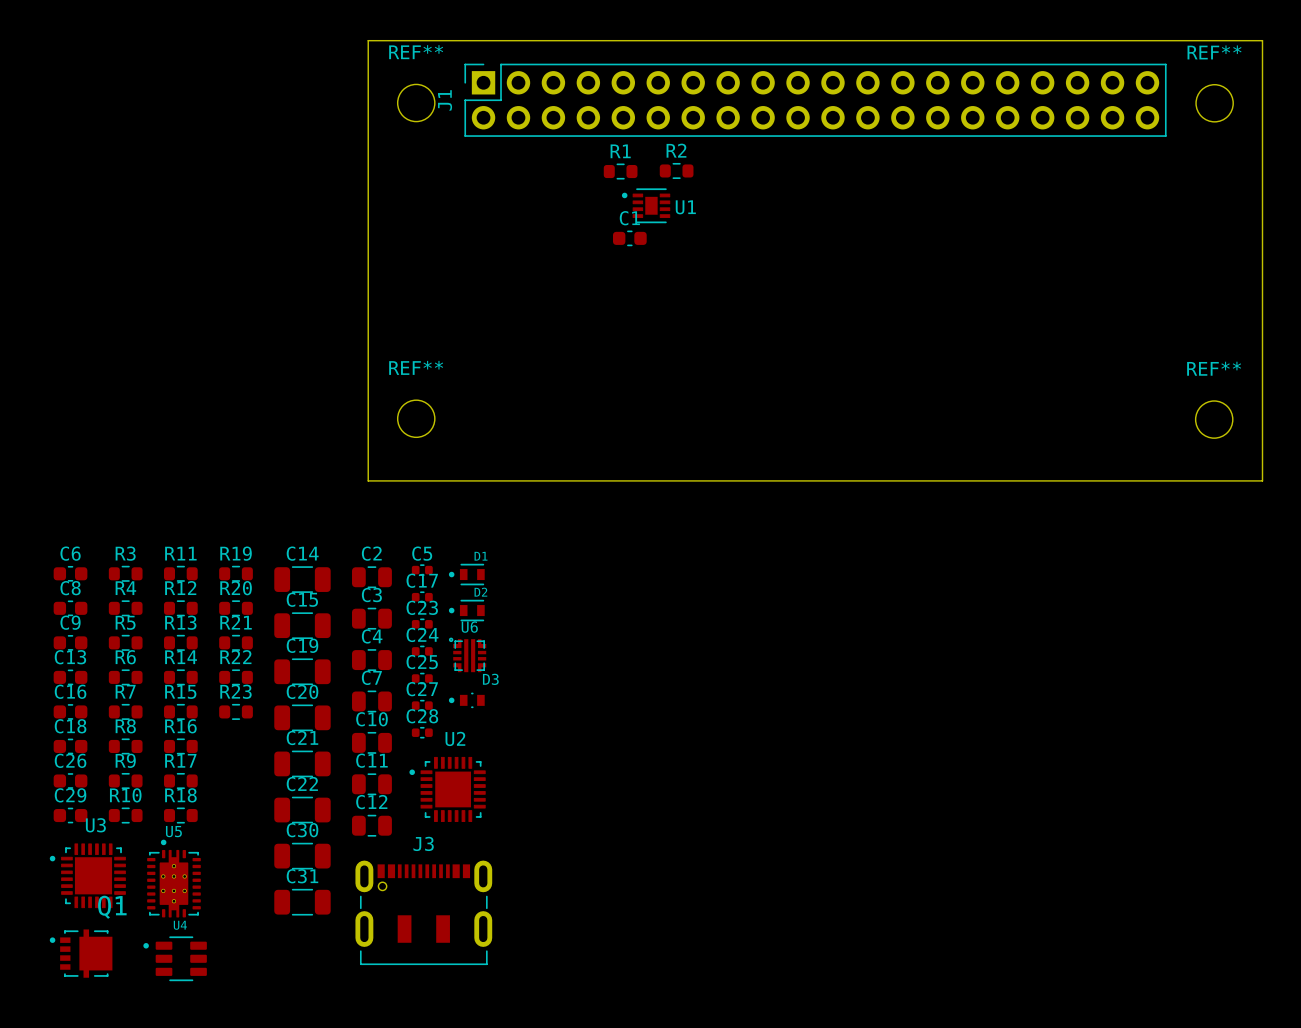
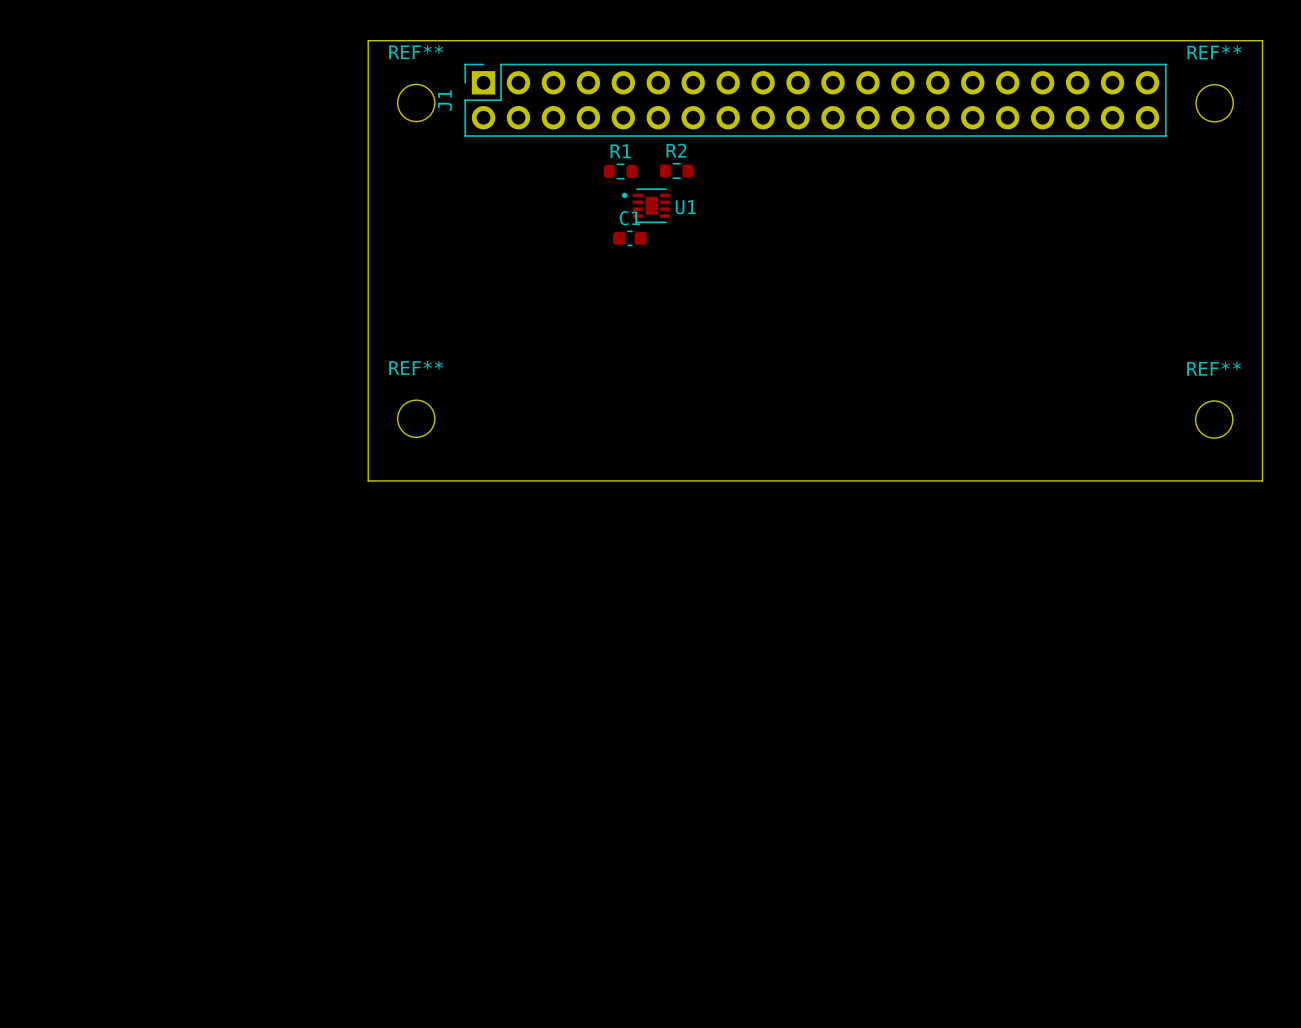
C5: (422, 570) -> none
C6: (70, 573) -> none
R3: (125, 573) -> none
R11: (180, 573) -> none
R19: (236, 573) -> none
D1: (466, 574) -> none
C2: (371, 577) -> none
C14: (302, 579) -> none
C17: (422, 597) -> none
C8: (70, 608) -> none
R4: (125, 608) -> none
R12: (180, 608) -> none
R20: (236, 608) -> none
D2: (466, 610) -> none
C3: (371, 618) -> none
C23: (422, 624) -> none
C15: (302, 625) -> none
C9: (70, 642) -> none
R5: (125, 642) -> none
R13: (180, 642) -> none
R21: (236, 642) -> none
C24: (422, 651) -> none
U6: (467, 654) -> none
C4: (371, 660) -> none
C19: (302, 671) -> none
C13: (70, 677) -> none
R6: (125, 677) -> none
R14: (180, 677) -> none
R22: (236, 677) -> none
C25: (422, 678) -> none
D3: (466, 700) -> none
C7: (371, 701) -> none
C27: (422, 705) -> none
C16: (70, 711) -> none
R7: (125, 711) -> none
R15: (180, 711) -> none
R23: (236, 711) -> none
C20: (302, 717) -> none
C28: (422, 732) -> none
C10: (371, 742) -> none
C18: (70, 746) -> none
R8: (125, 746) -> none
R16: (180, 746) -> none
C21: (302, 763) -> none
C26: (70, 780) -> none
R9: (125, 780) -> none
R17: (180, 780) -> none
C11: (371, 784) -> none
U2: (447, 789) -> none
C22: (302, 810) -> none
C29: (70, 815) -> none
R10: (125, 815) -> none
R18: (180, 815) -> none
C12: (371, 825) -> none
C30: (302, 856) -> none
U3: (87, 875) -> none
U5: (173, 878) -> none
C31: (302, 902) -> none
J3: (423, 912) -> none
Q1: (81, 953) -> none
U4: (175, 958) -> none

